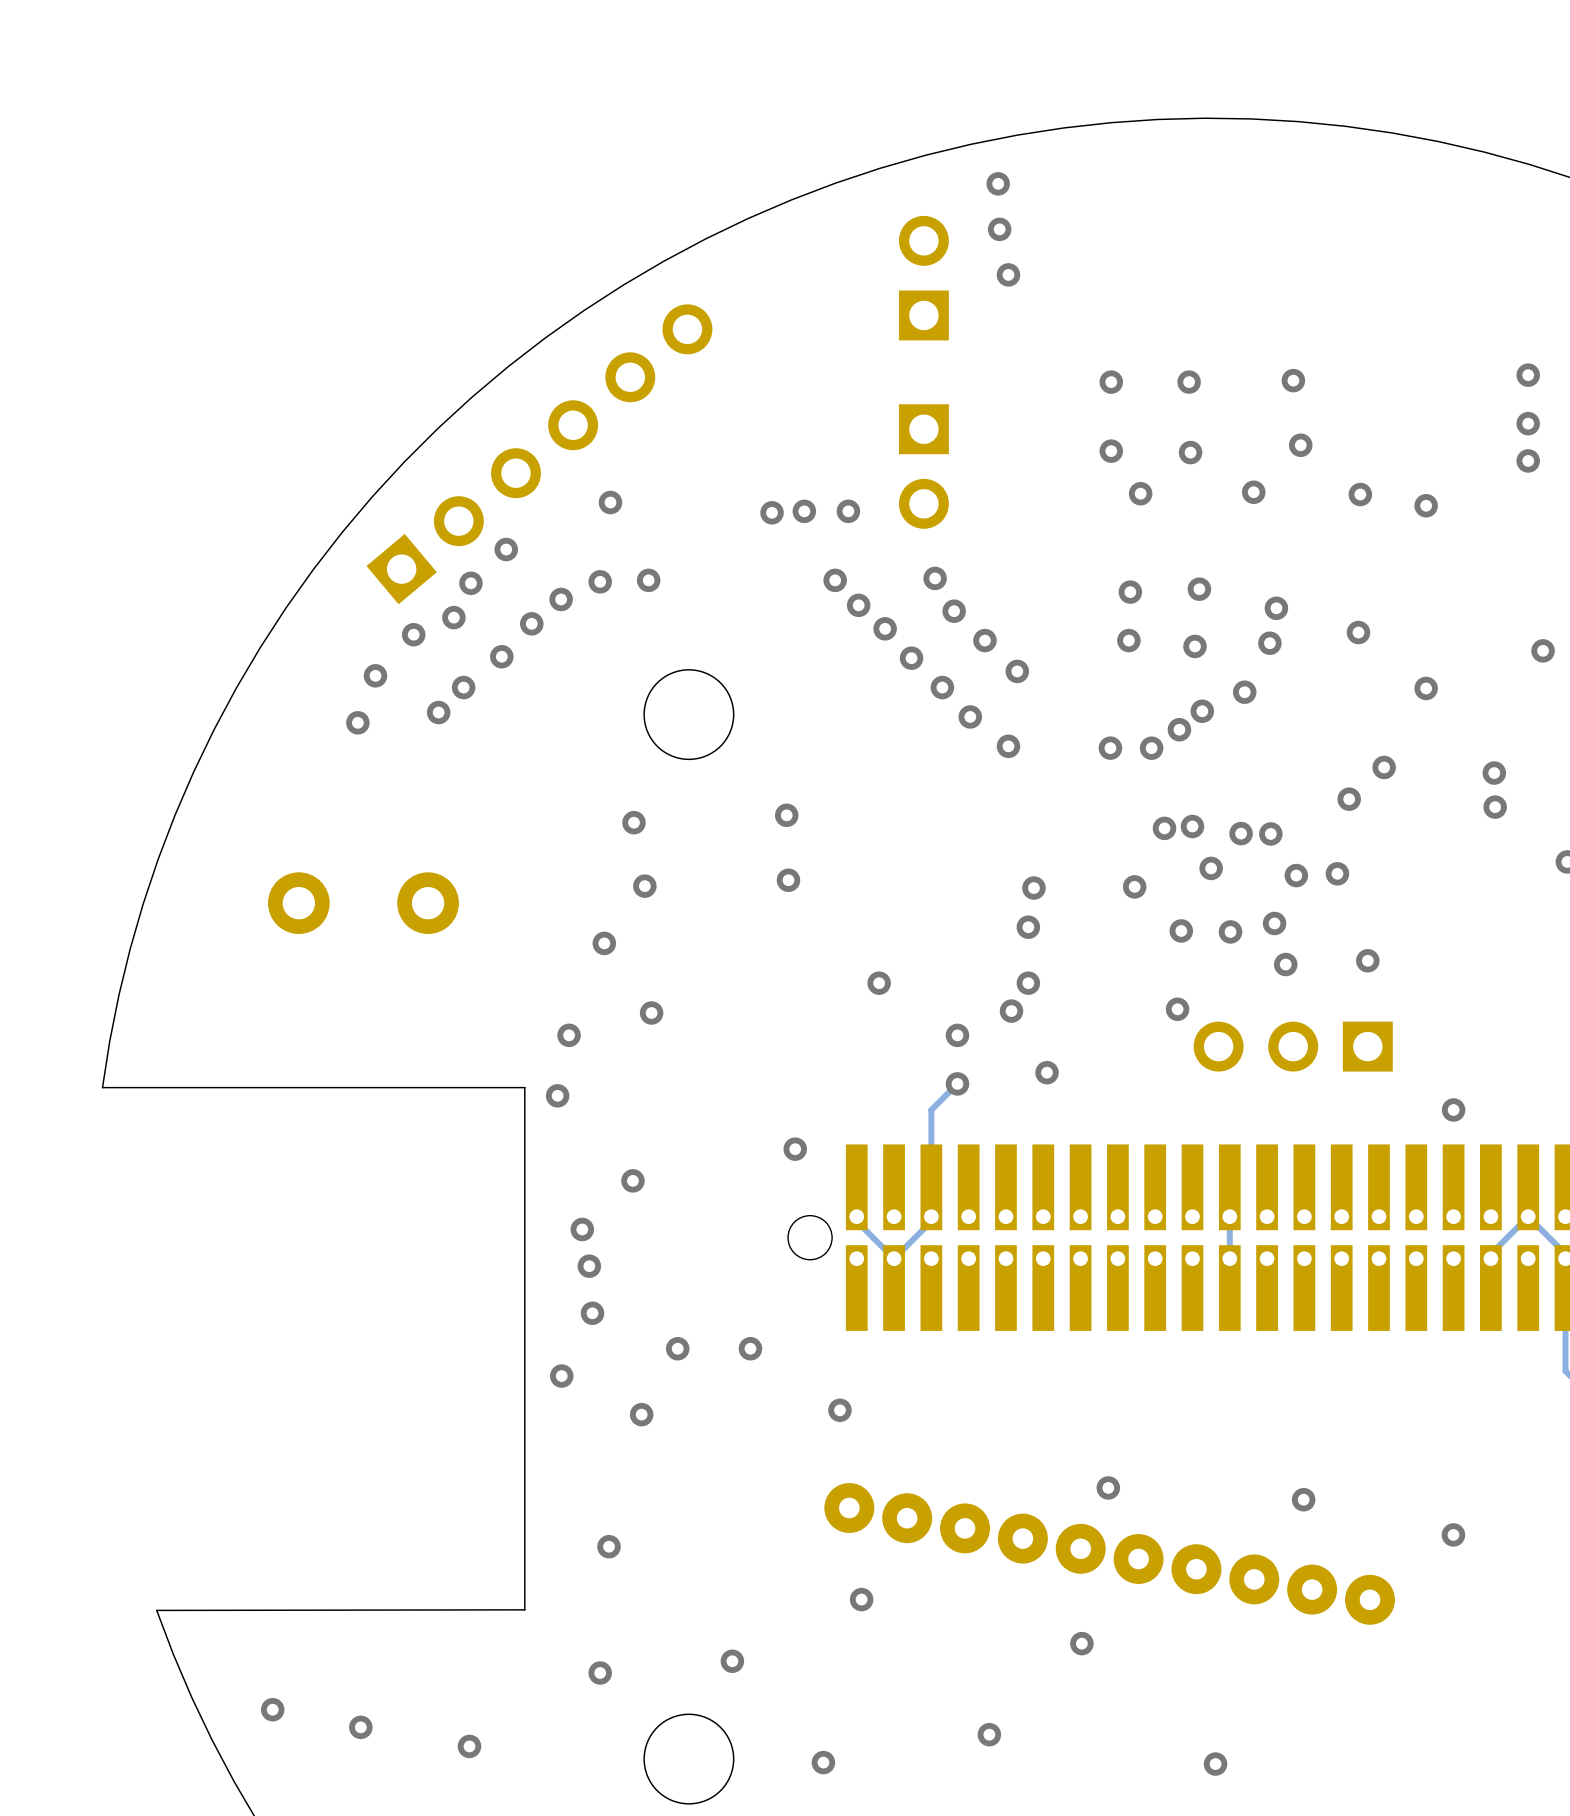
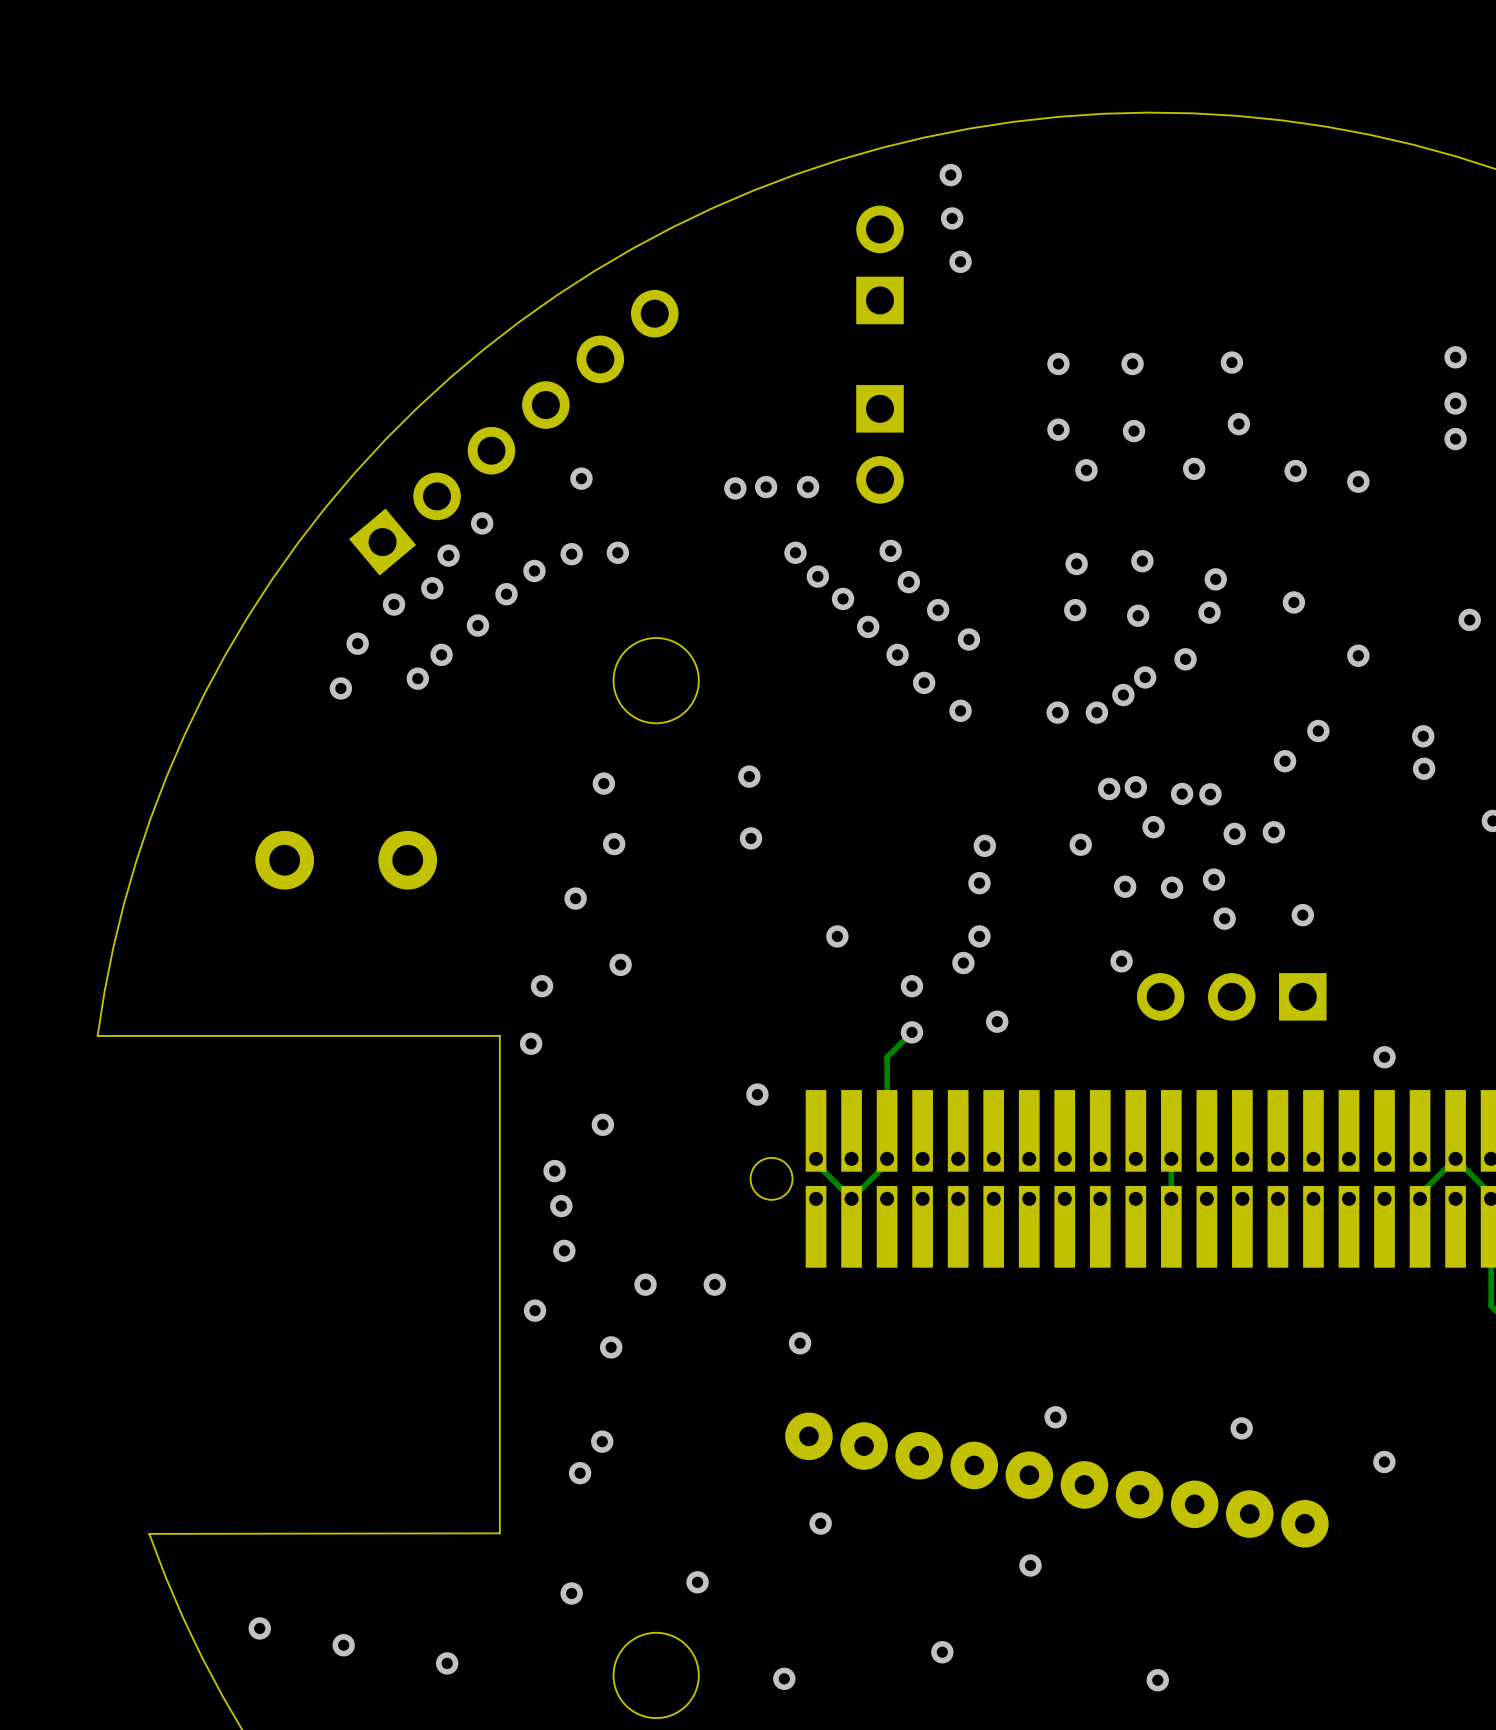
via: none -> (602, 1441)

